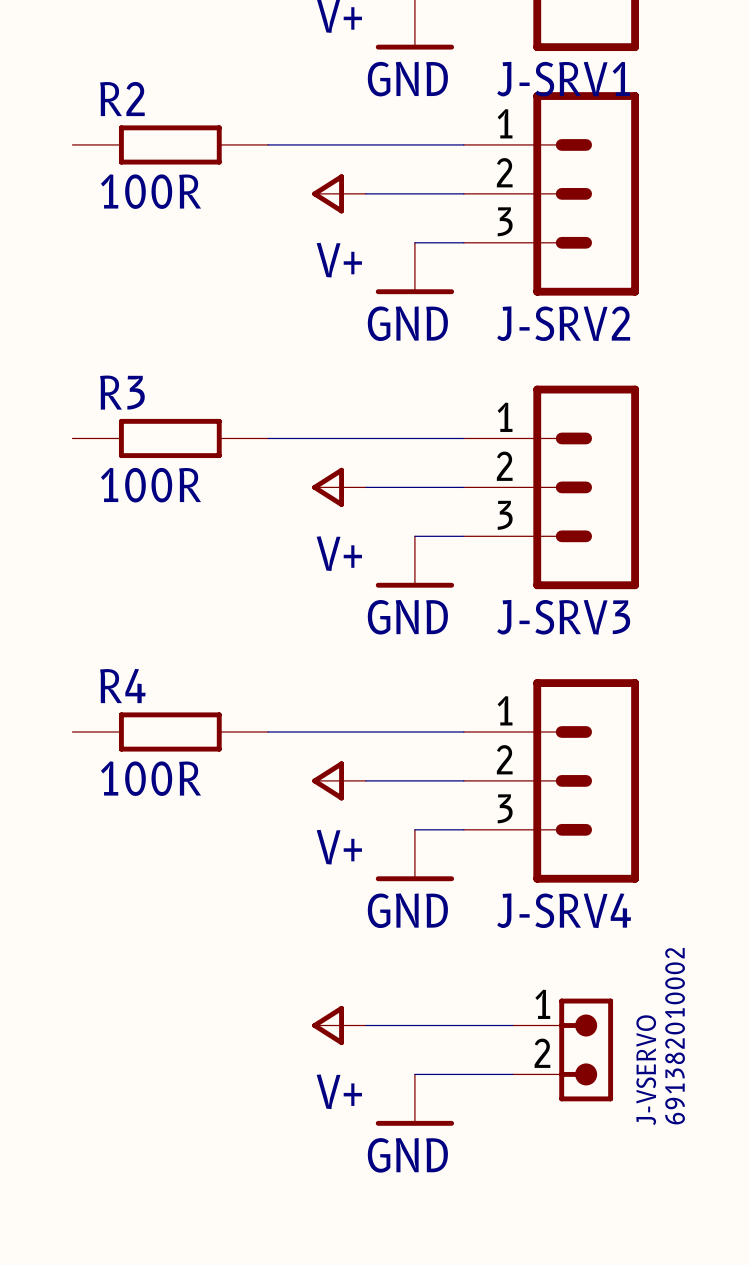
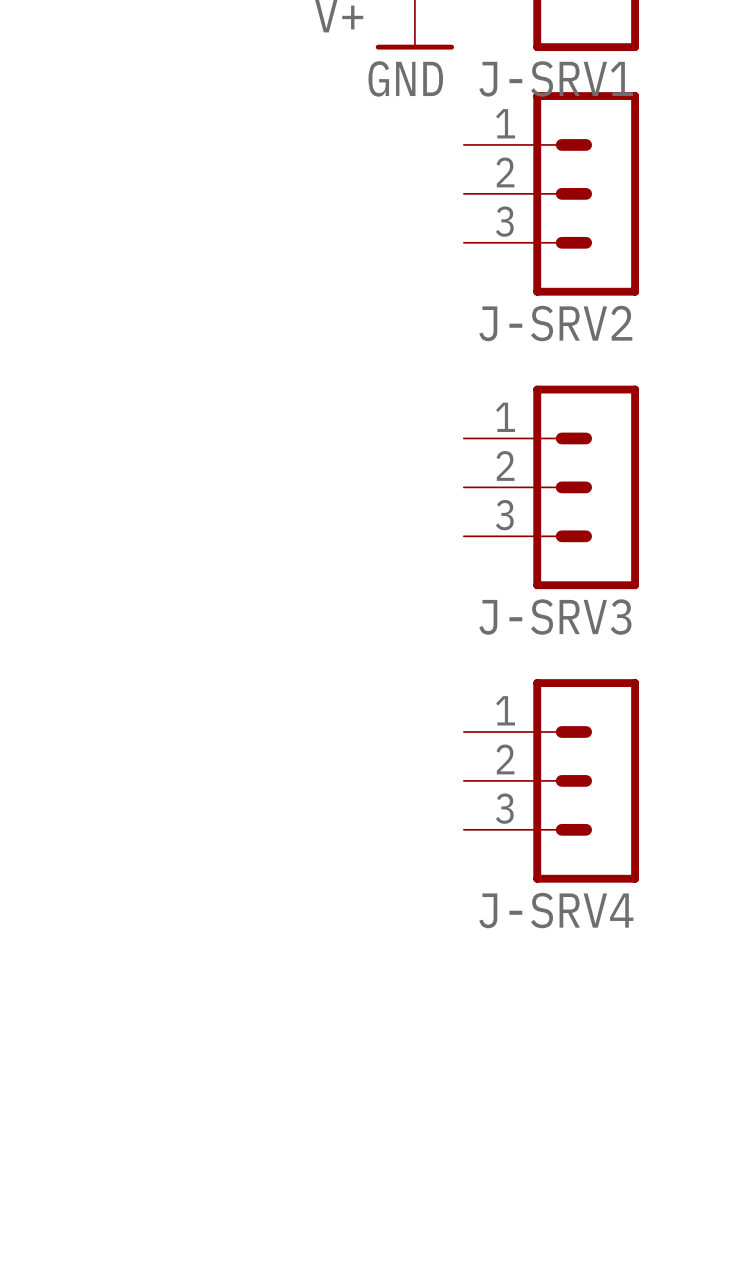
R2: 100R (170, 144) -> none
wire: (268, 144) (463, 144) -> none
power symbol: V+ (339, 193) -> none
wire: (366, 193) (463, 193) -> none
wire: (414, 242) (463, 242) -> none
power symbol: GND (414, 268) -> none
R3: 100R (170, 438) -> none
wire: (268, 438) (463, 438) -> none
power symbol: V+ (339, 487) -> none
wire: (366, 487) (463, 487) -> none
wire: (414, 536) (463, 536) -> none
power symbol: GND (414, 562) -> none
R4: 100R (170, 731) -> none
wire: (268, 731) (463, 731) -> none
power symbol: V+ (339, 780) -> none
wire: (366, 780) (463, 780) -> none
wire: (414, 829) (463, 829) -> none
power symbol: GND (414, 855) -> none
power symbol: V+ (339, 1025) -> none
wire: (366, 1025) (512, 1025) -> none
J-VSERVO: 691382010002 (562, 1049) -> none
wire: (414, 1074) (512, 1074) -> none
power symbol: GND (414, 1100) -> none

